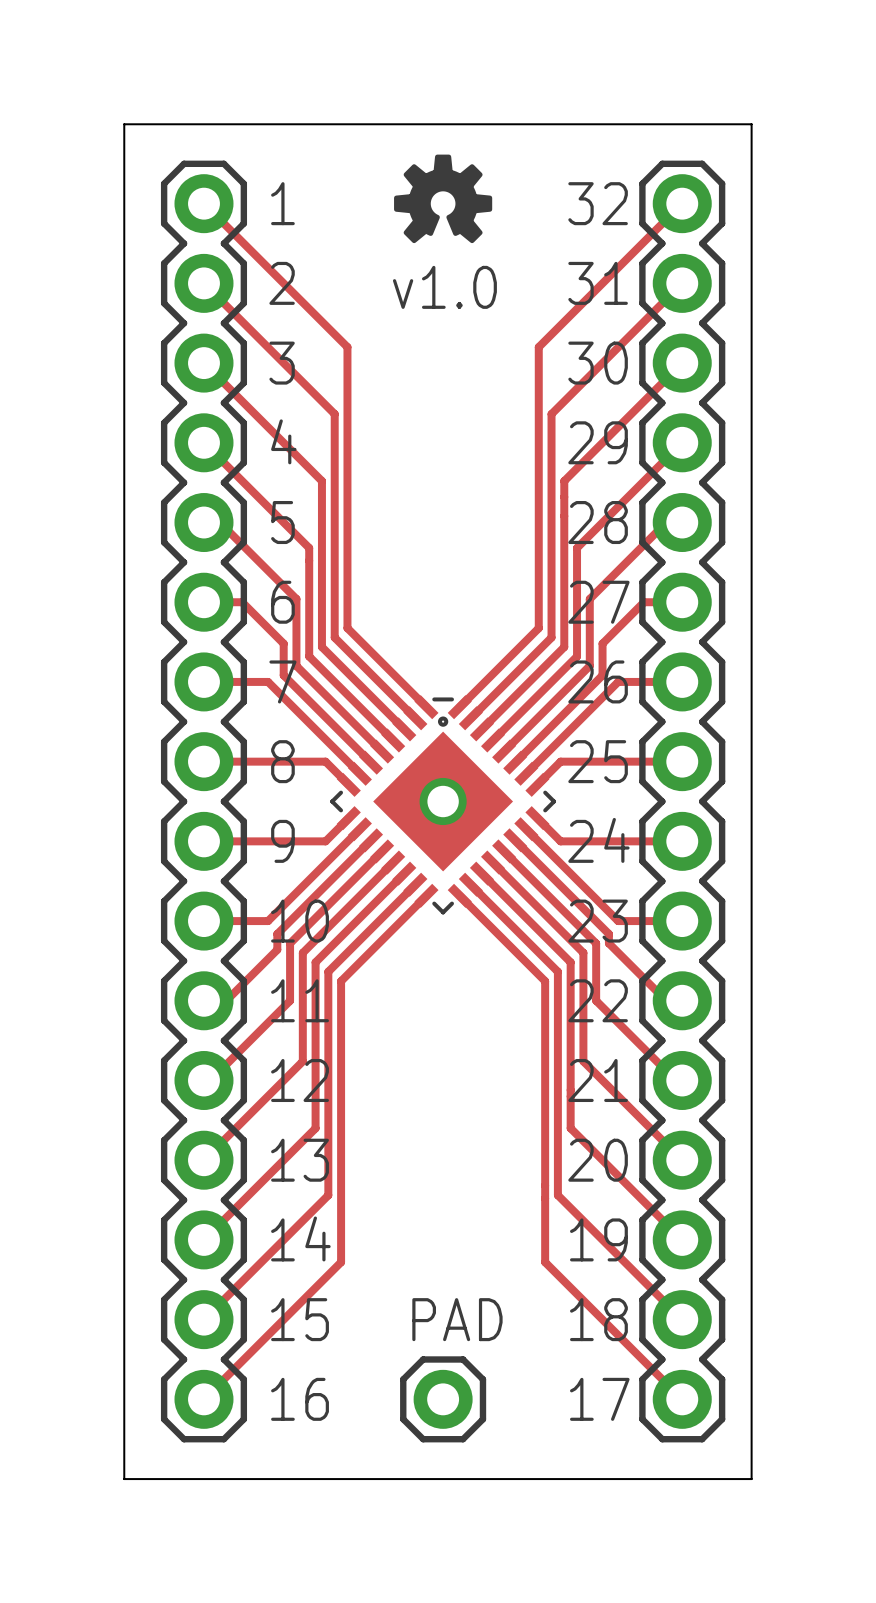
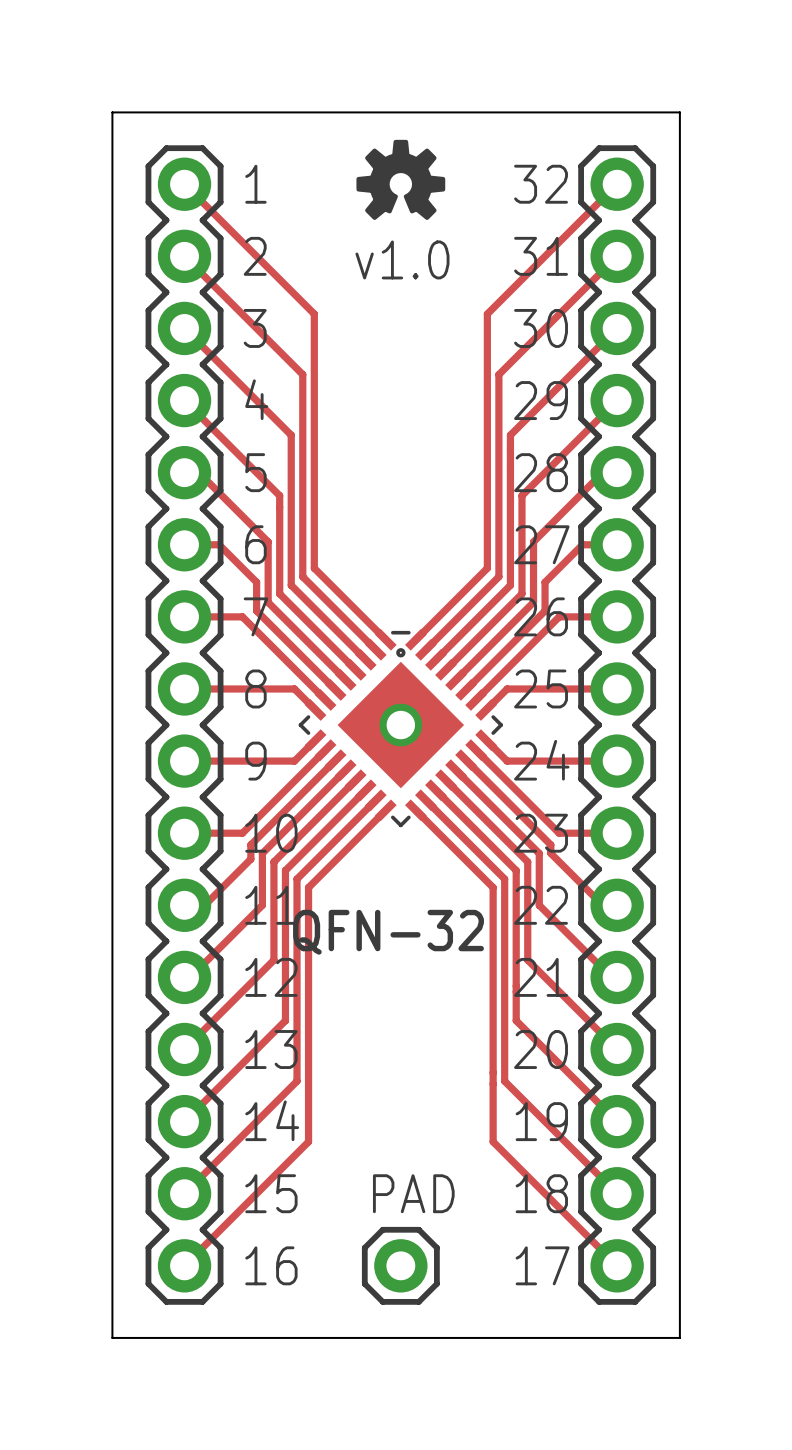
text: none -> QFN-32 (388, 932)

